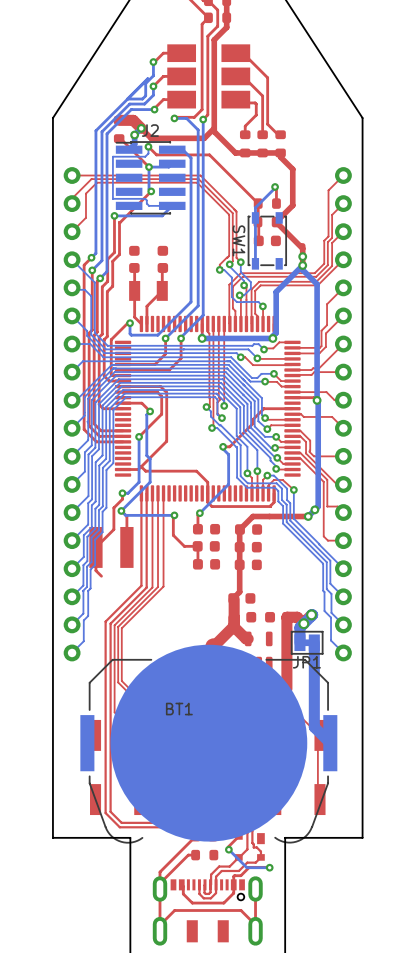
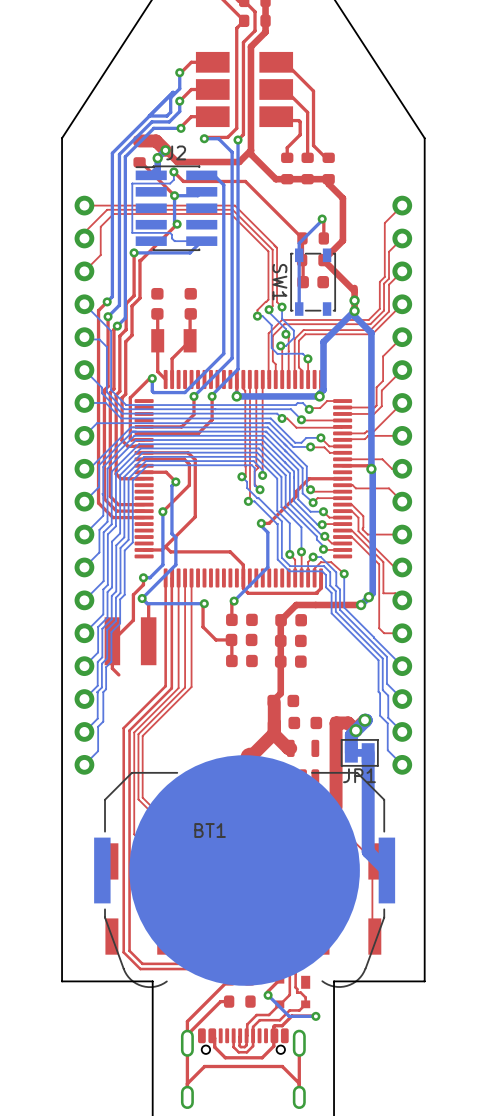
part footprint: [152, 876, 263, 946] -> [180, 1028, 306, 1110]

